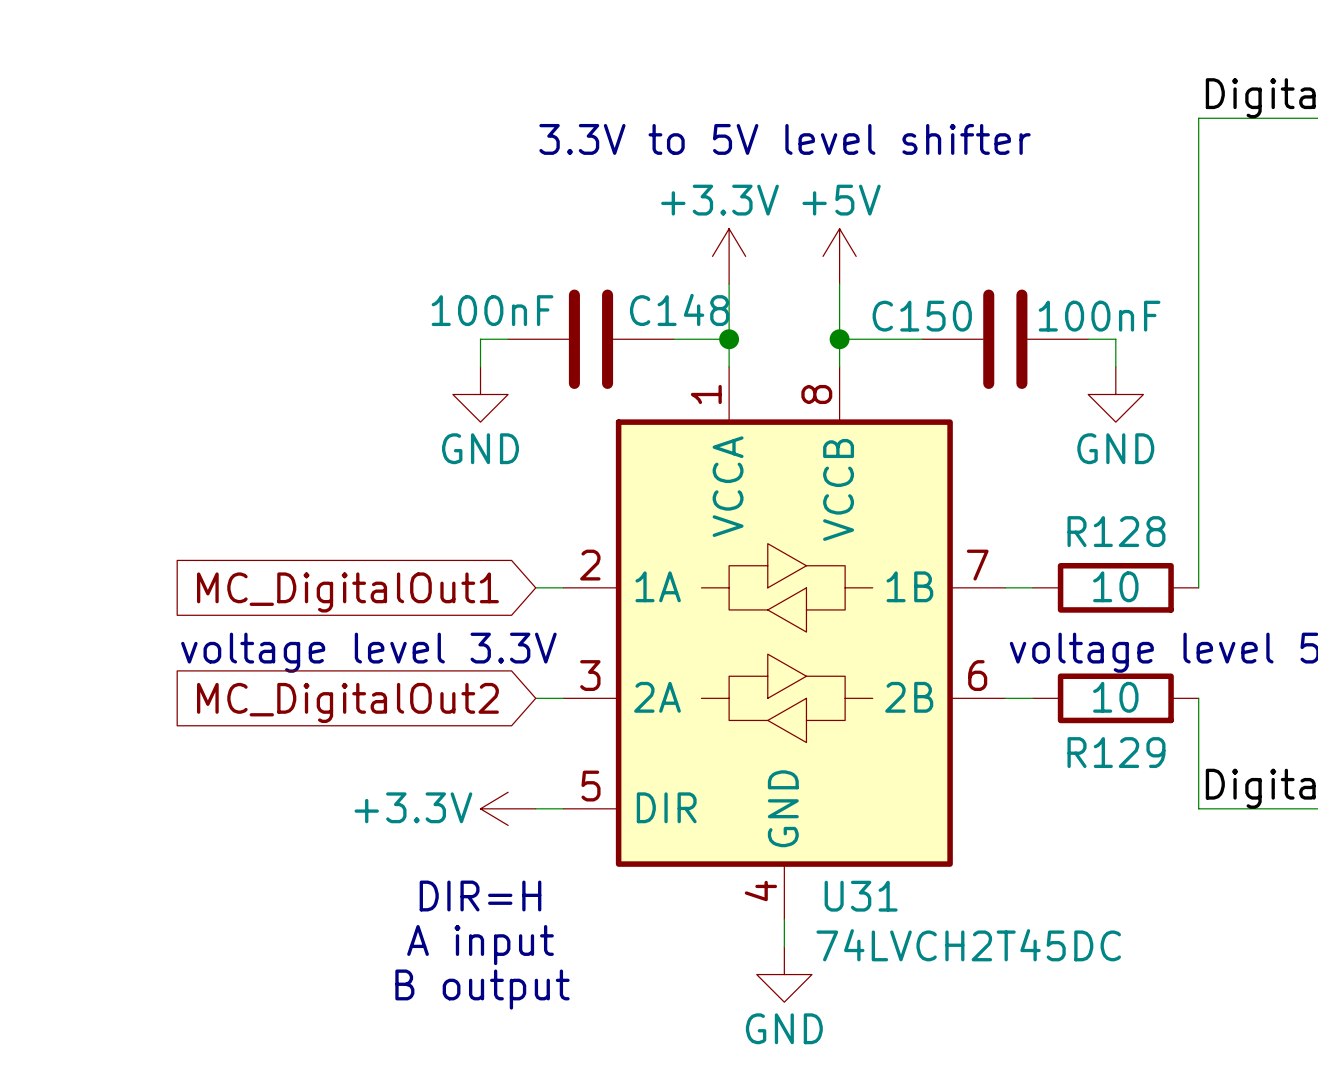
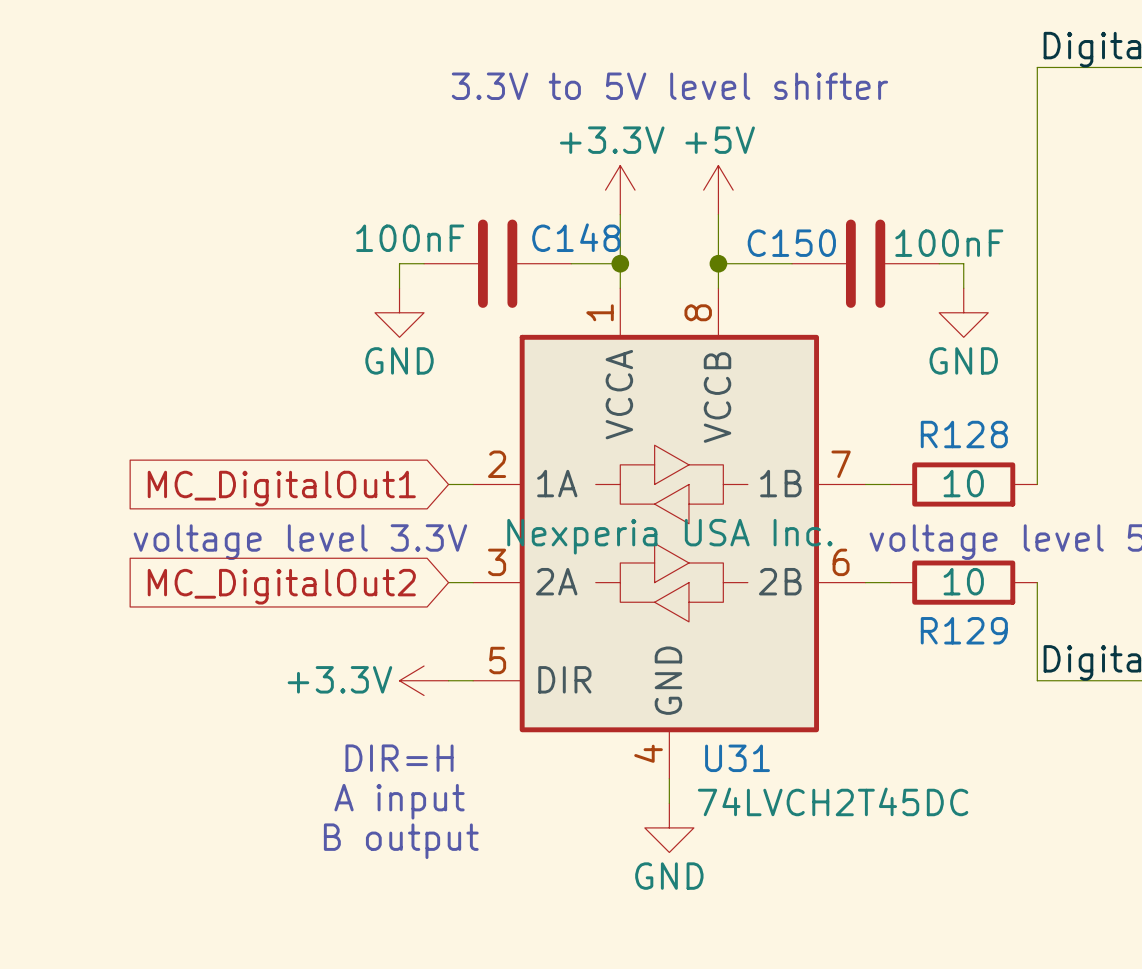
U31 text: none -> Nexperia USA Inc. (669, 536)

